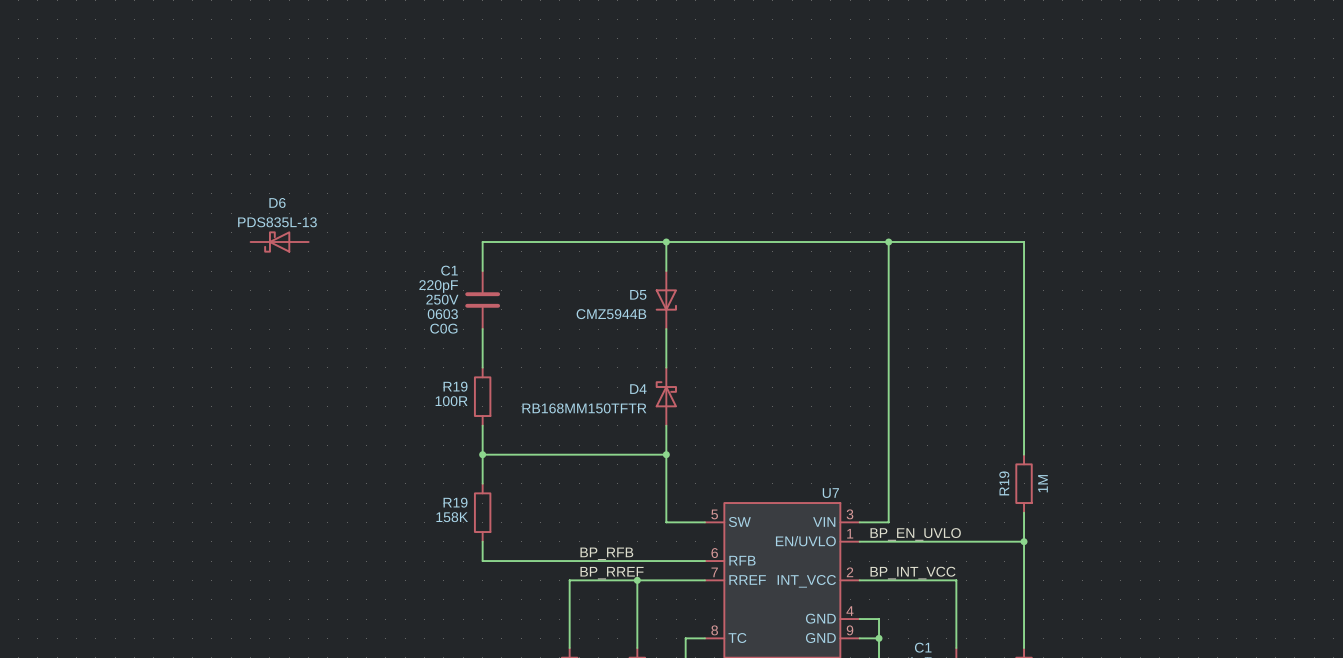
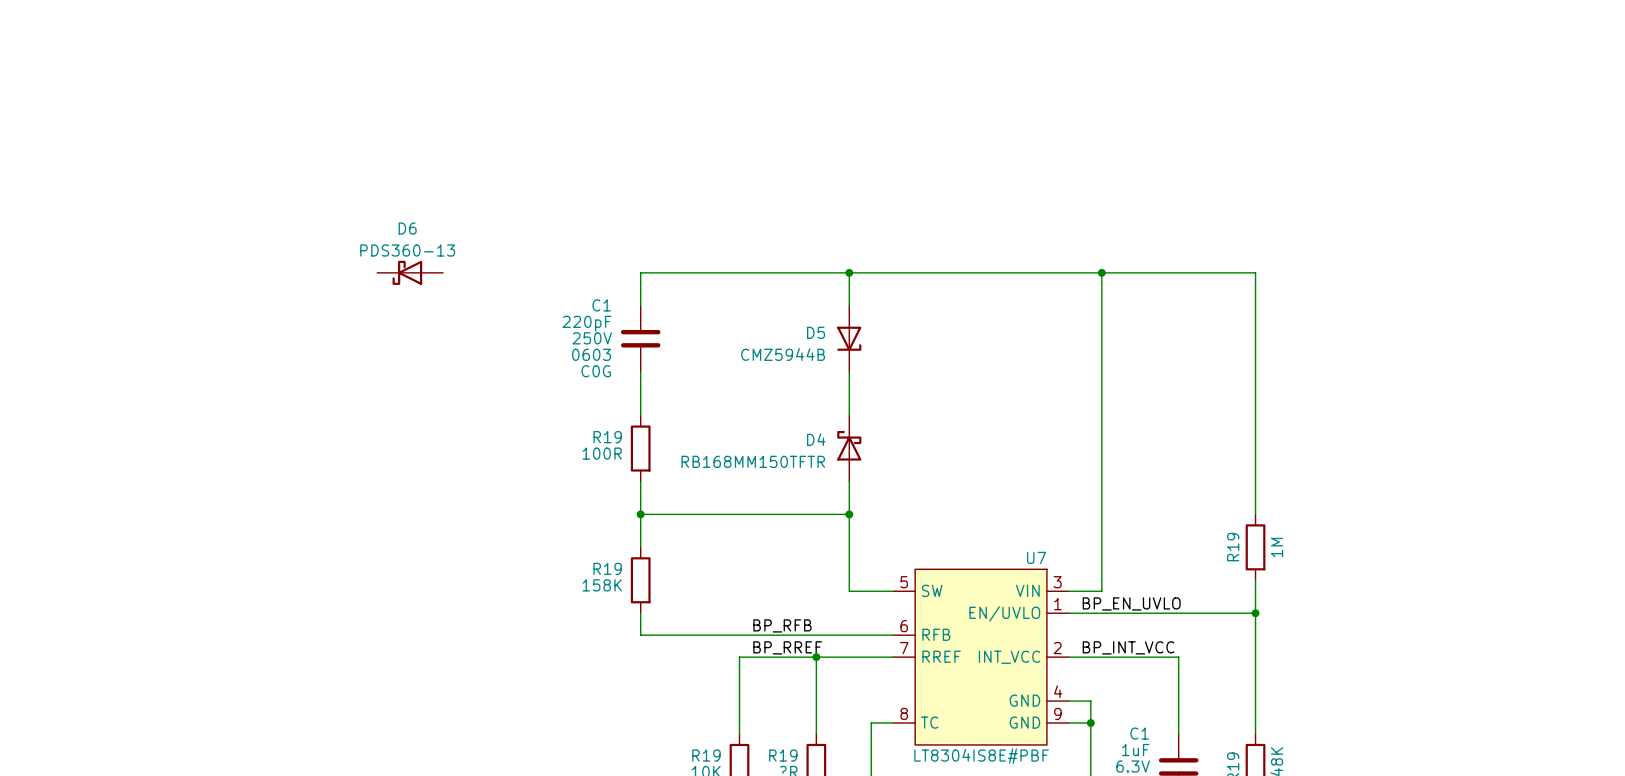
D6 value: PDS835L-13 (277, 222) -> PDS360-13 (407, 250)

